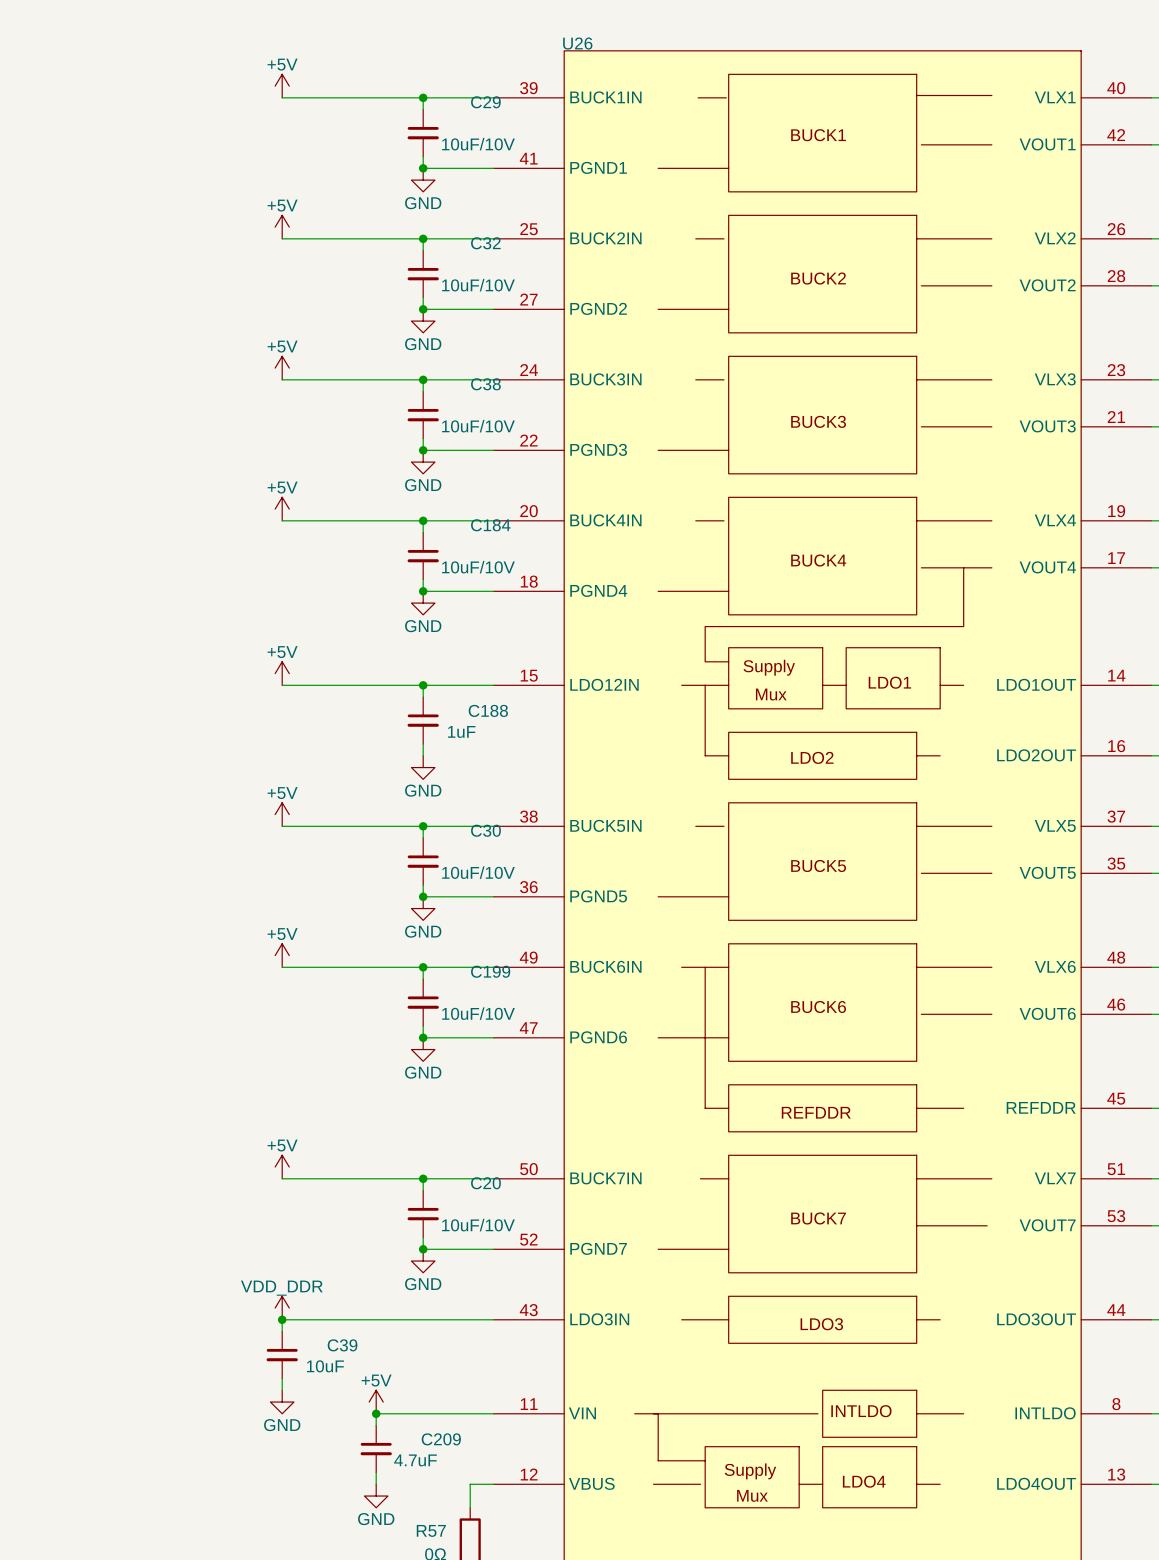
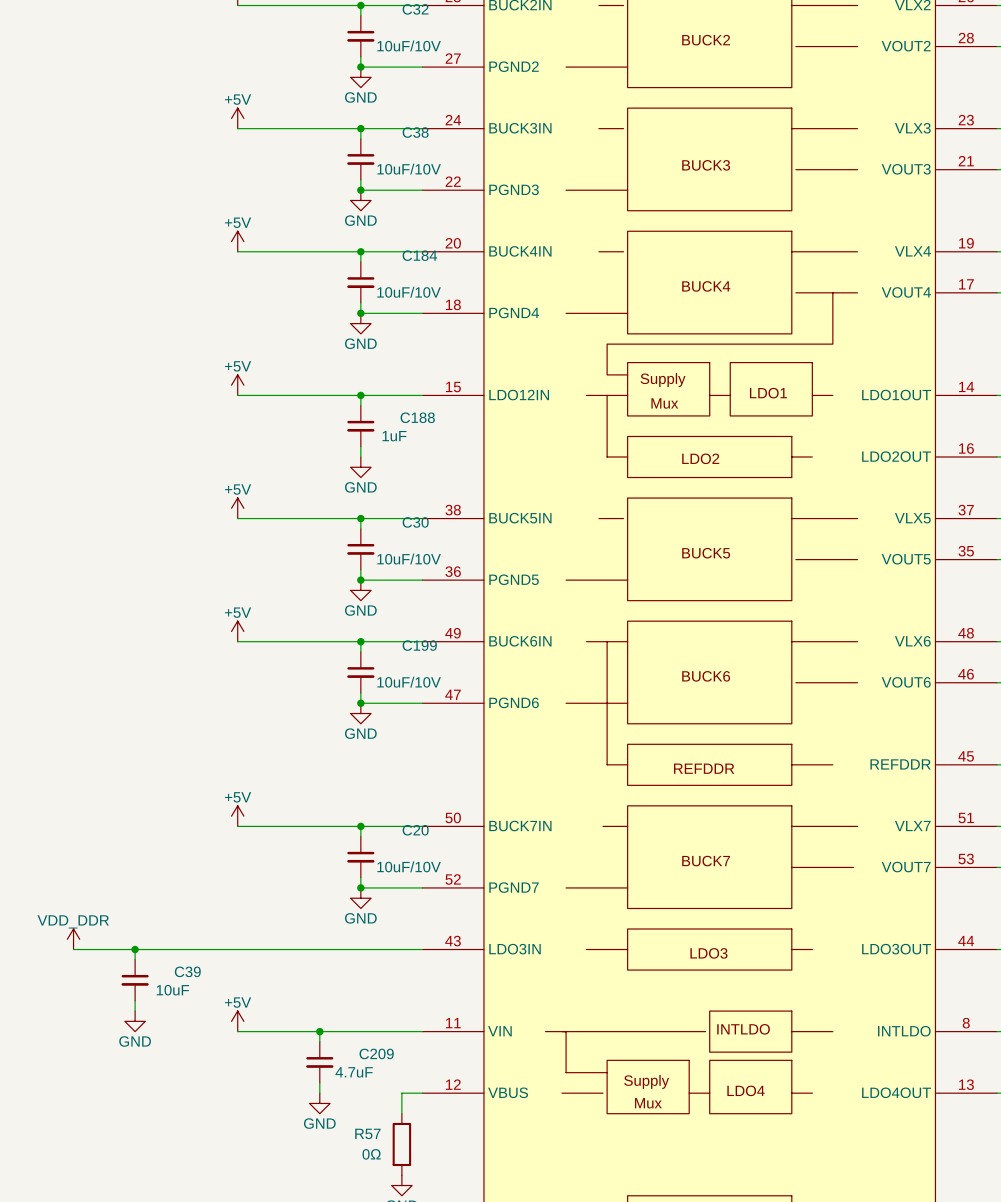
power symbol position: VDD_DDR (282, 1308) -> VDD_DDR (73, 939)
wire: none -> (135, 949) (135, 959)
junction: none -> (135, 949)
wire: (282, 1319) (282, 1331) -> (237, 949) (73, 949)
junction: (282, 1319) -> none
C39 position: (282, 1355) -> (135, 980)
wire: (282, 1378) (282, 1390) -> (135, 1000) (135, 1011)
power symbol: none -> GND (135, 1021)
power symbol: GND (282, 1402) -> +5V (237, 1021)
power symbol: +5V (376, 1402) -> none
wire: none -> (237, 1031) (319, 1031)

